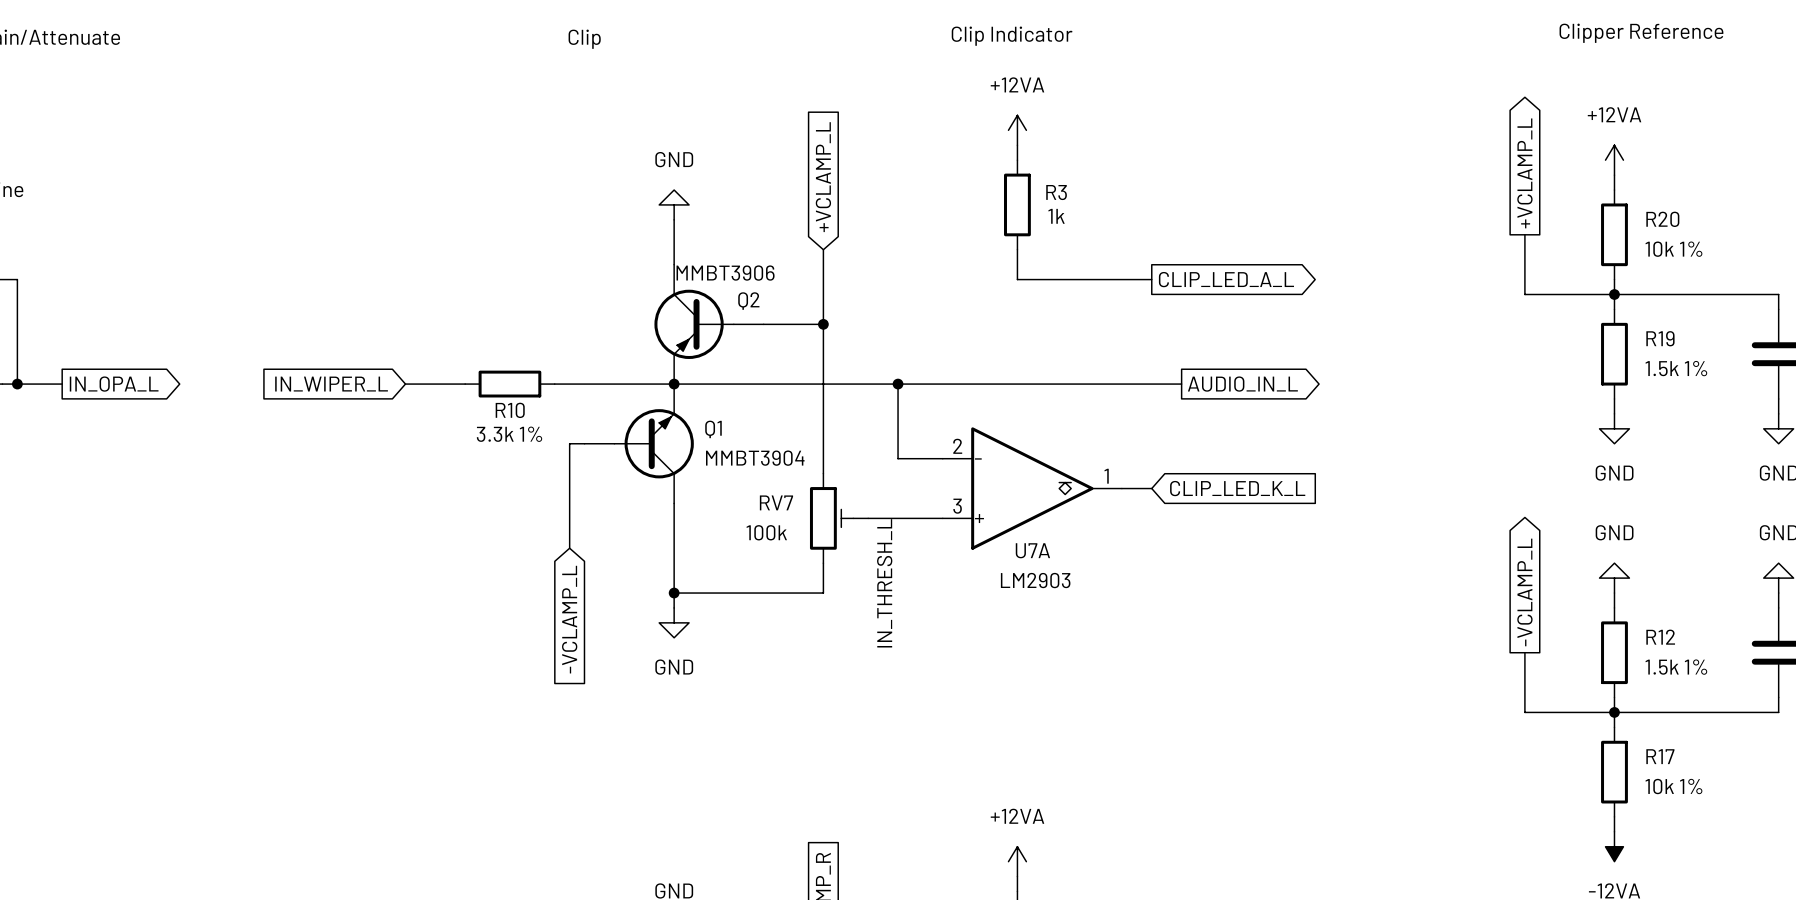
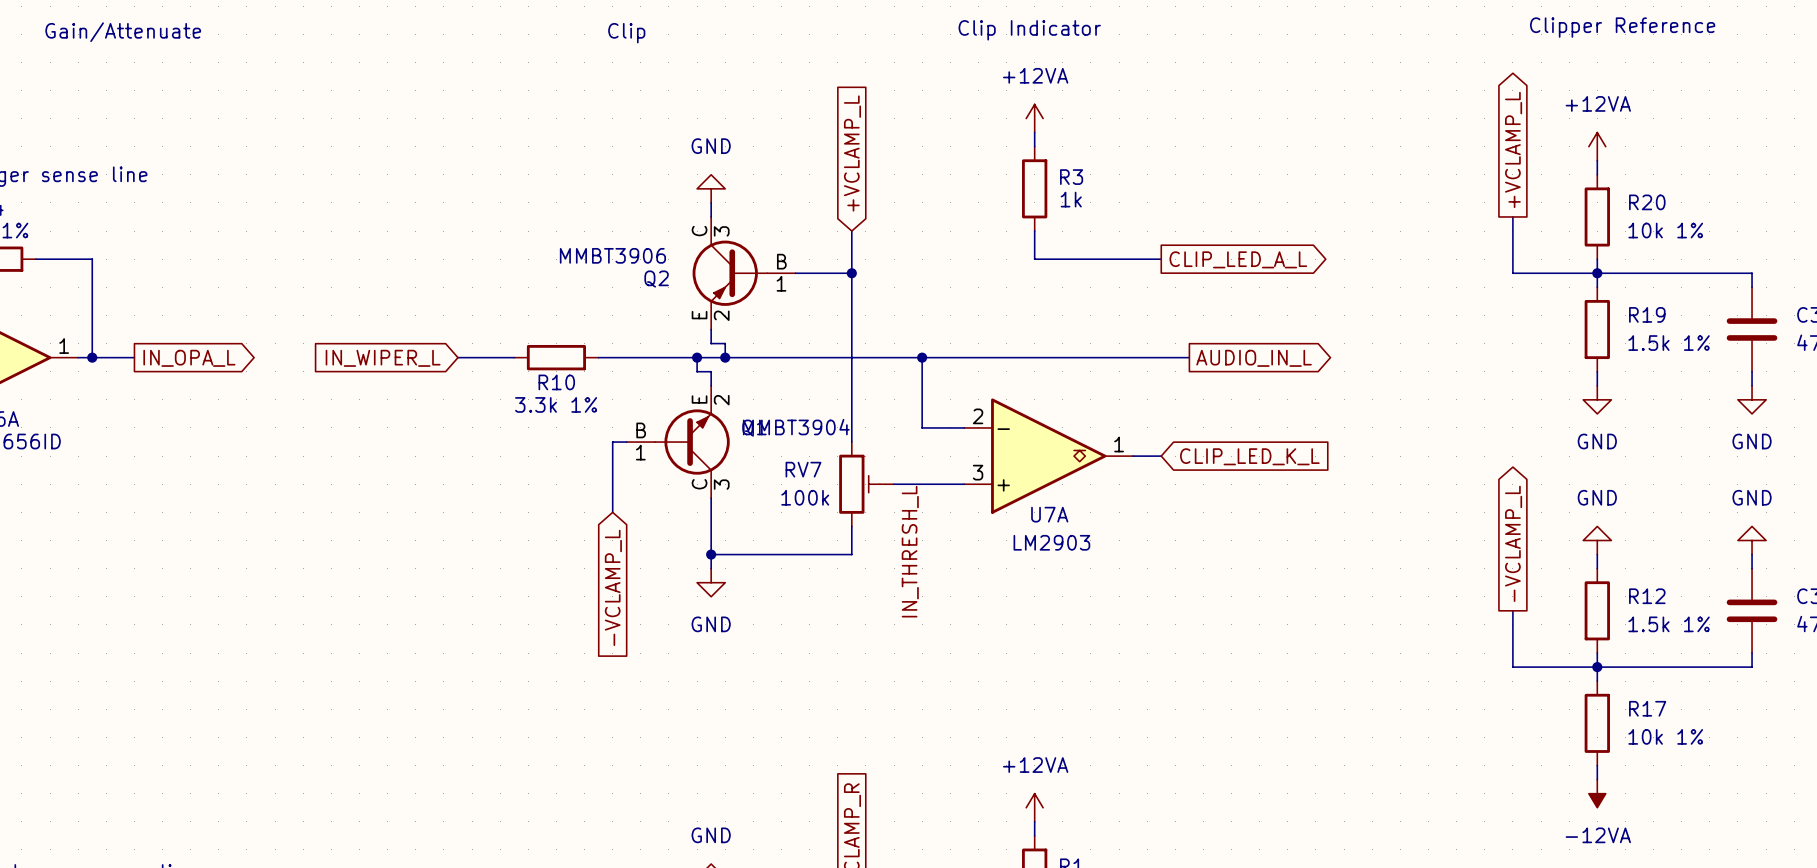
Q2 pin name: none -> C (699, 231)
Q2 pin number: none -> 3 (721, 231)
Q2 value position: MMBT3906 (725, 273) -> MMBT3906 (612, 255)
Q2 pin name: none -> B (781, 261)
Q2 name position: Q2 (748, 301) -> Q2 (656, 279)
Q2 pin number: none -> 1 (781, 283)
Q2 position: (709, 324) -> (744, 273)
wire: (763, 324) (823, 324) -> (795, 273) (851, 273)
junction position: (823, 324) -> (851, 273)
Q2 pin name: none -> E (699, 315)
Q2 pin number: none -> 2 (721, 315)
wire: none -> (711, 329) (711, 343) (725, 343) (725, 357)
wire: none -> (697, 357) (697, 371) (711, 371) (711, 385)
junction: none -> (697, 357)
junction: (674, 384) -> none
junction: none -> (725, 357)
Q1 pin name: none -> E (699, 399)
Q1 pin number: none -> 2 (721, 400)
wire: (584, 443) (569, 443) (569, 473) -> (626, 442) (612, 442)
Q1 position: (639, 443) -> (678, 442)
Q1 pin name: none -> B (641, 430)
Q1 pin number: none -> 1 (640, 452)
Q1 pin name: none -> C (699, 484)
Q1 pin number: none -> 3 (721, 484)
RV7 value position: 100k (766, 532) -> 100k (805, 497)

